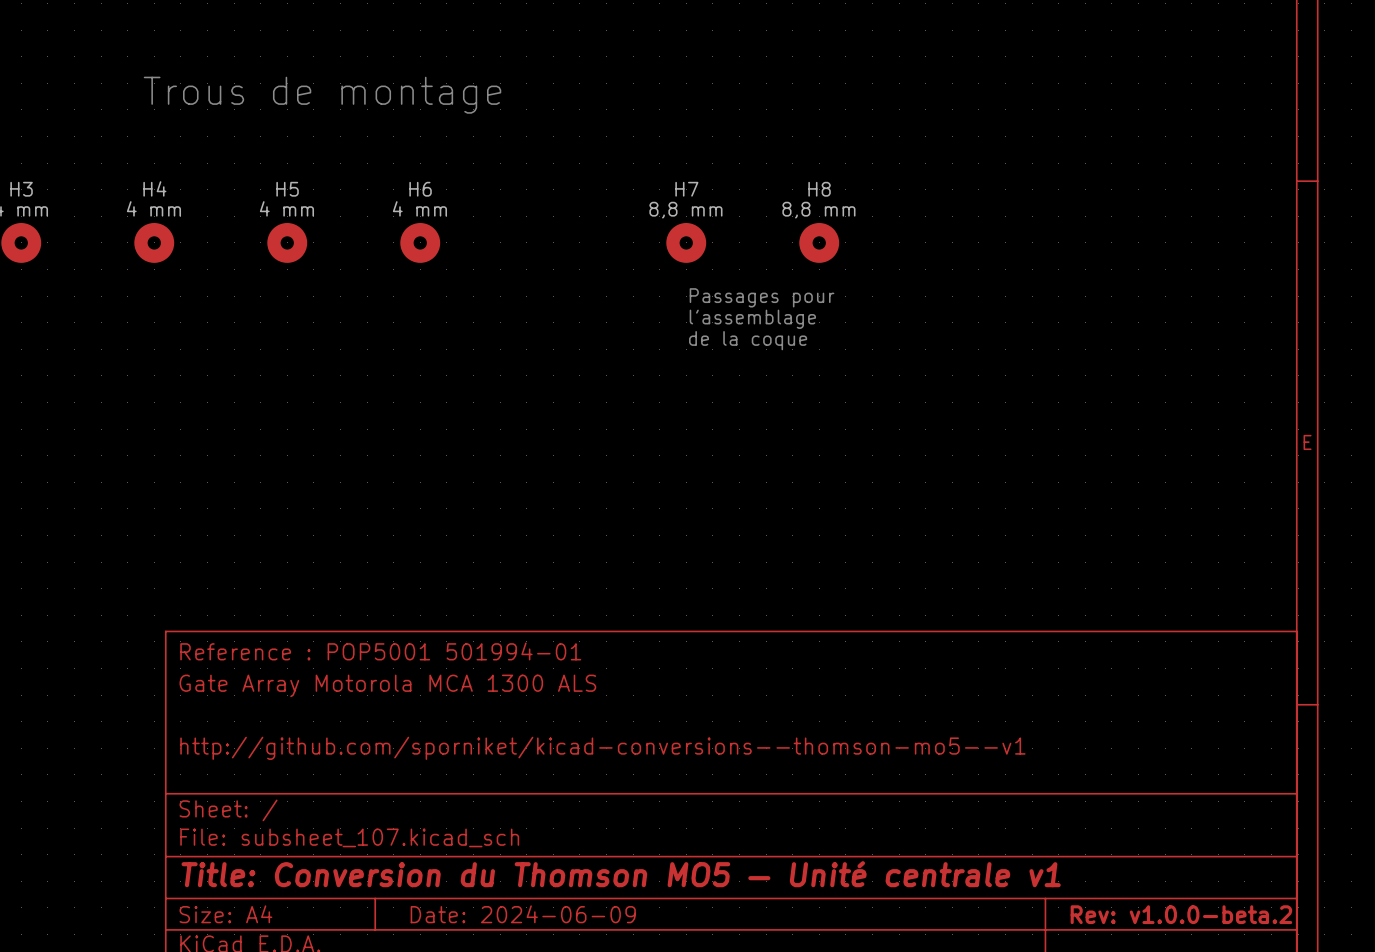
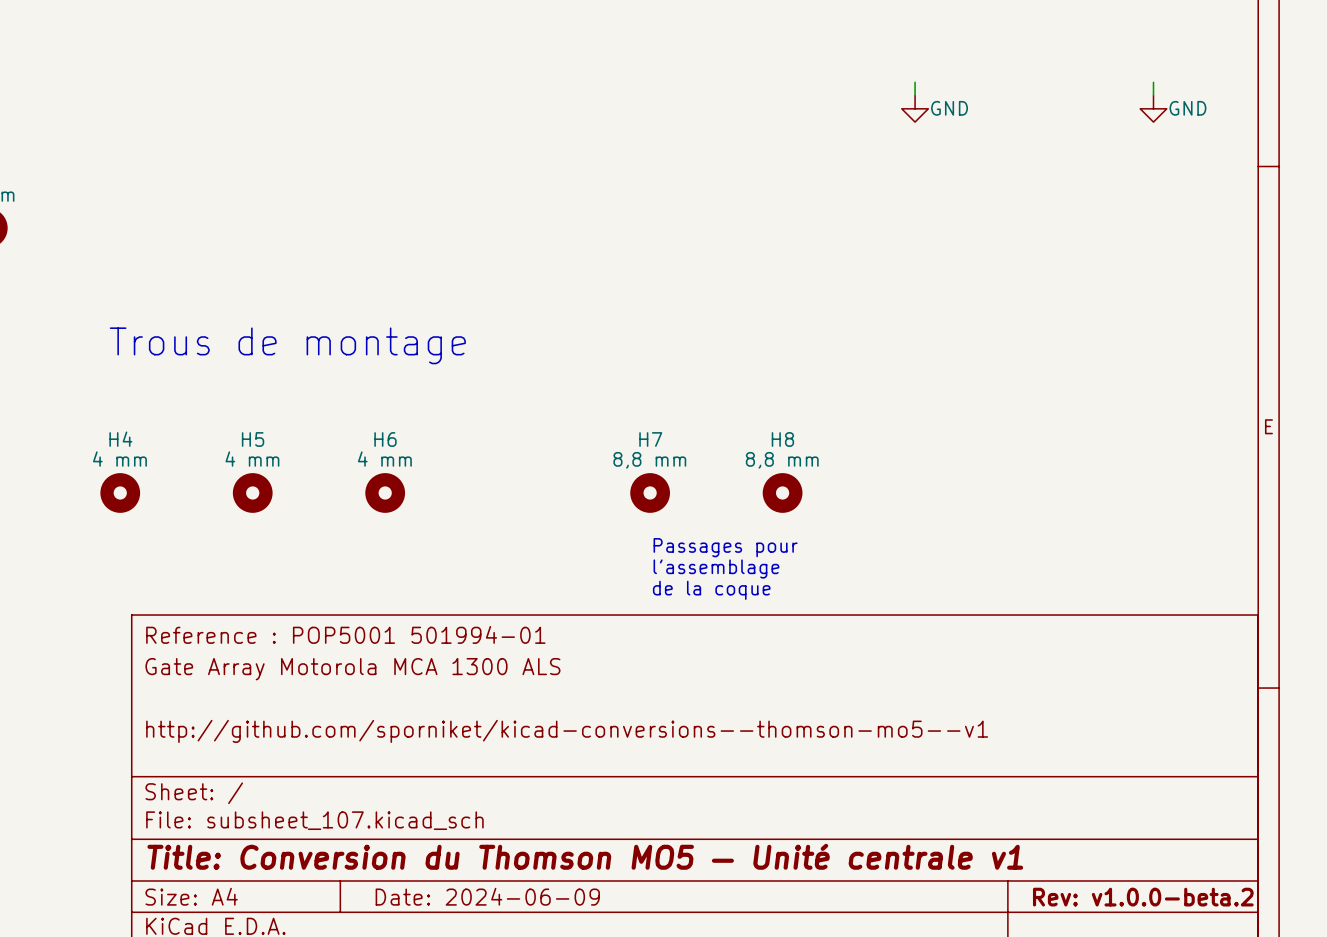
text: Trous de montage (322, 95) -> none
wire: none -> (915, 82) (915, 95)
wire: none -> (1153, 82) (1153, 95)
power symbol: none -> GND (915, 108)
power symbol: none -> GND (1153, 108)
H4 position: (154, 242) -> (120, 492)
H5 position: (287, 242) -> (252, 492)
H6 position: (420, 242) -> (385, 492)
H7 position: (686, 242) -> (650, 492)
H8 position: (819, 242) -> (782, 492)
text: Passages pour (762, 297) -> none
text: l'assemblage (752, 319) -> none
text: de la coque (748, 340) -> none
text: none -> Trous de montage (287, 345)
text: none -> Passages pour (725, 547)
text: none -> l'assemblage (716, 568)
text: none -> de la coque (711, 590)

